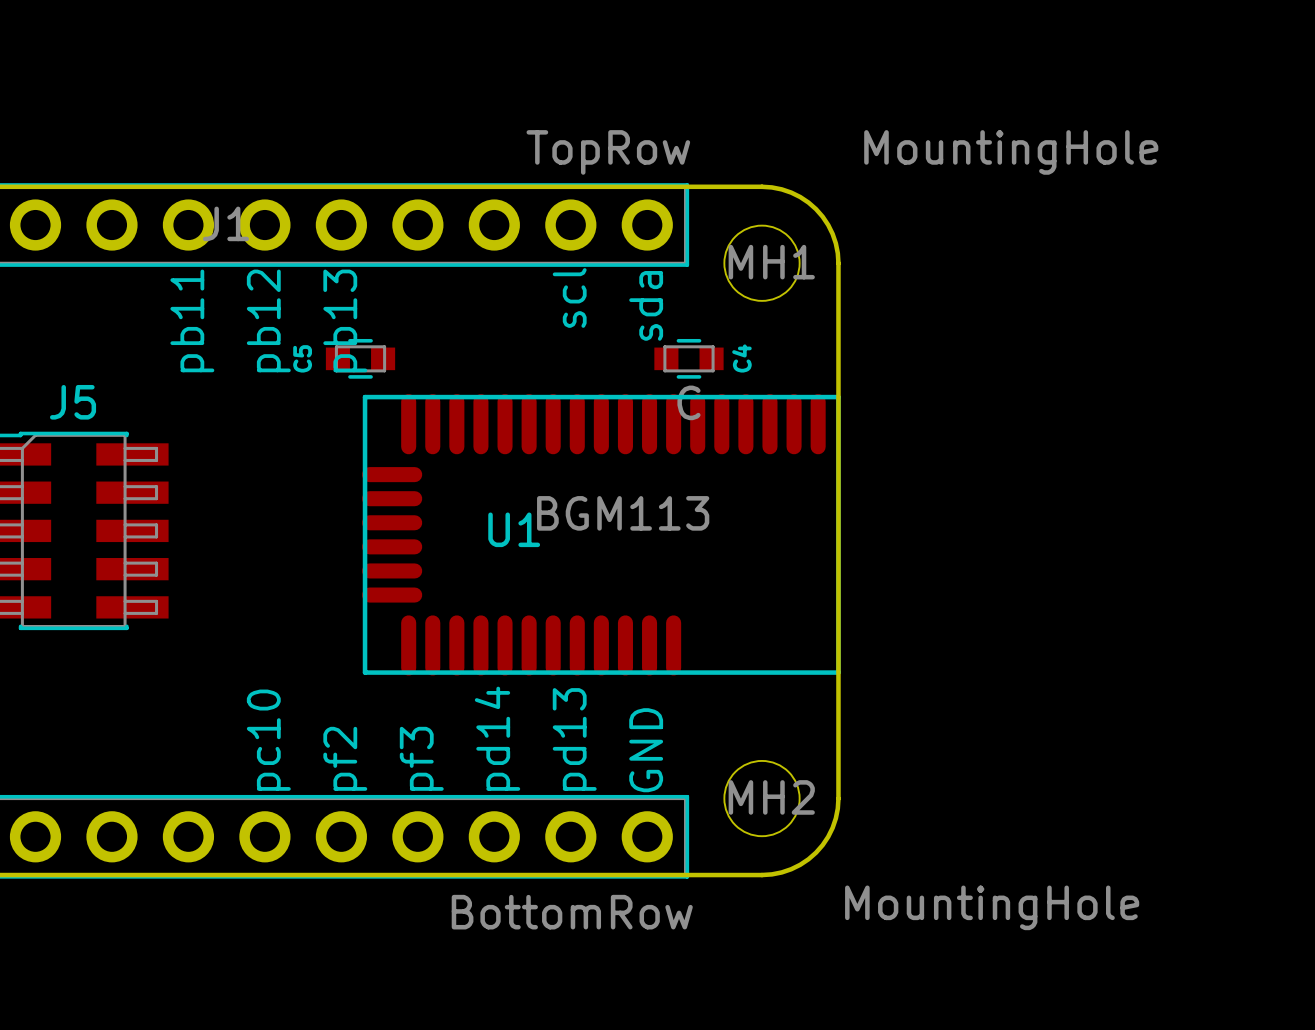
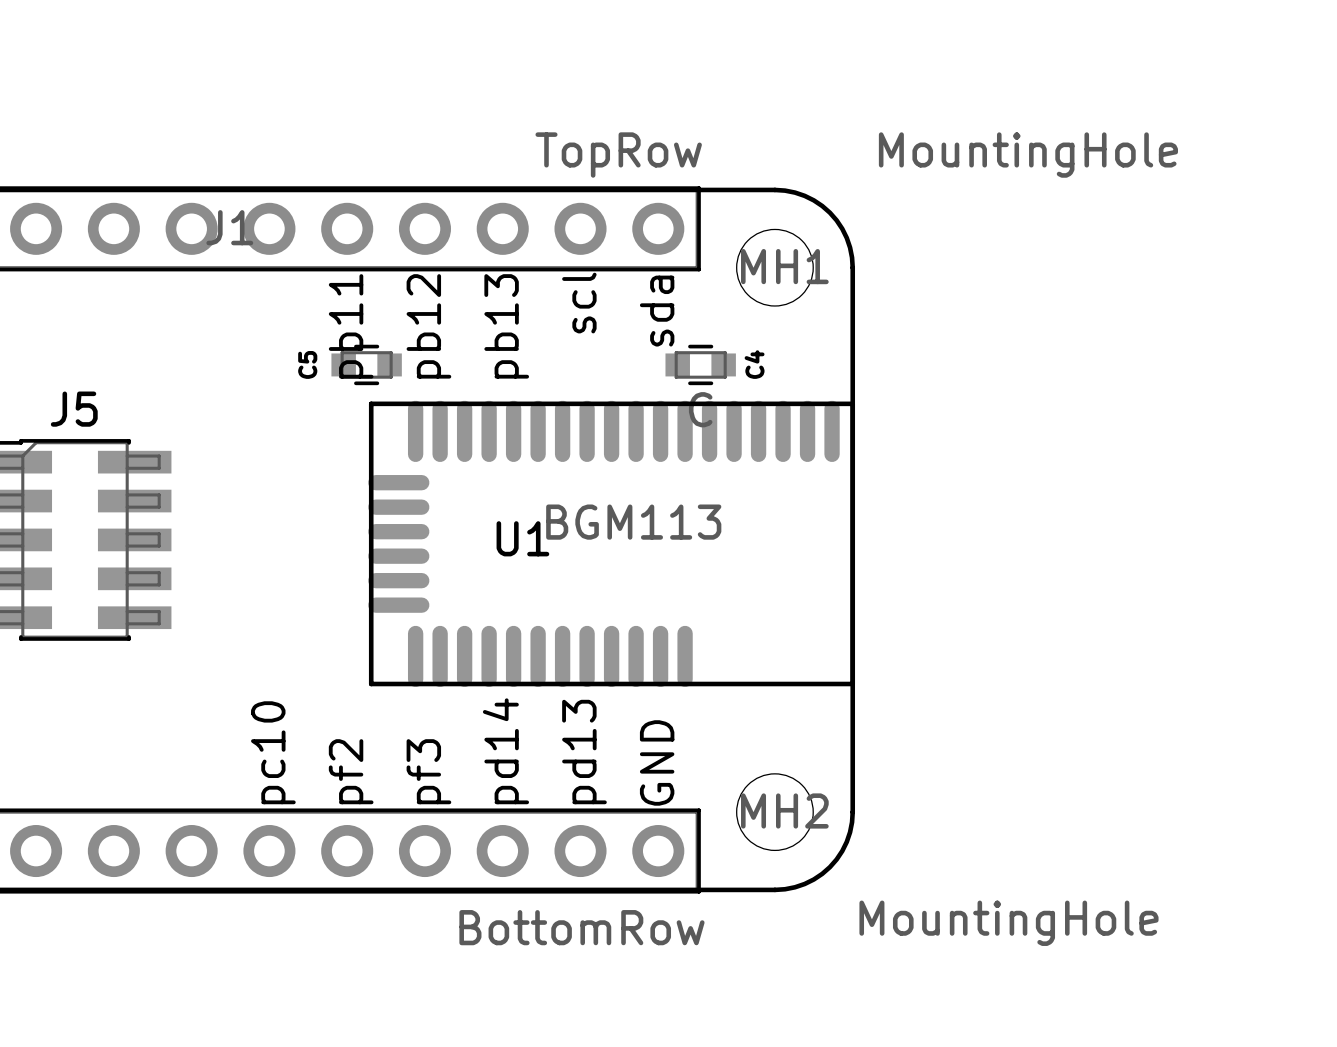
text: pb11 (192, 320) -> none
text position: pb12 (268, 320) -> pb12 (428, 326)
text: pb13 (345, 320) -> pb11 (351, 326)
text: none -> pb13 (506, 326)

